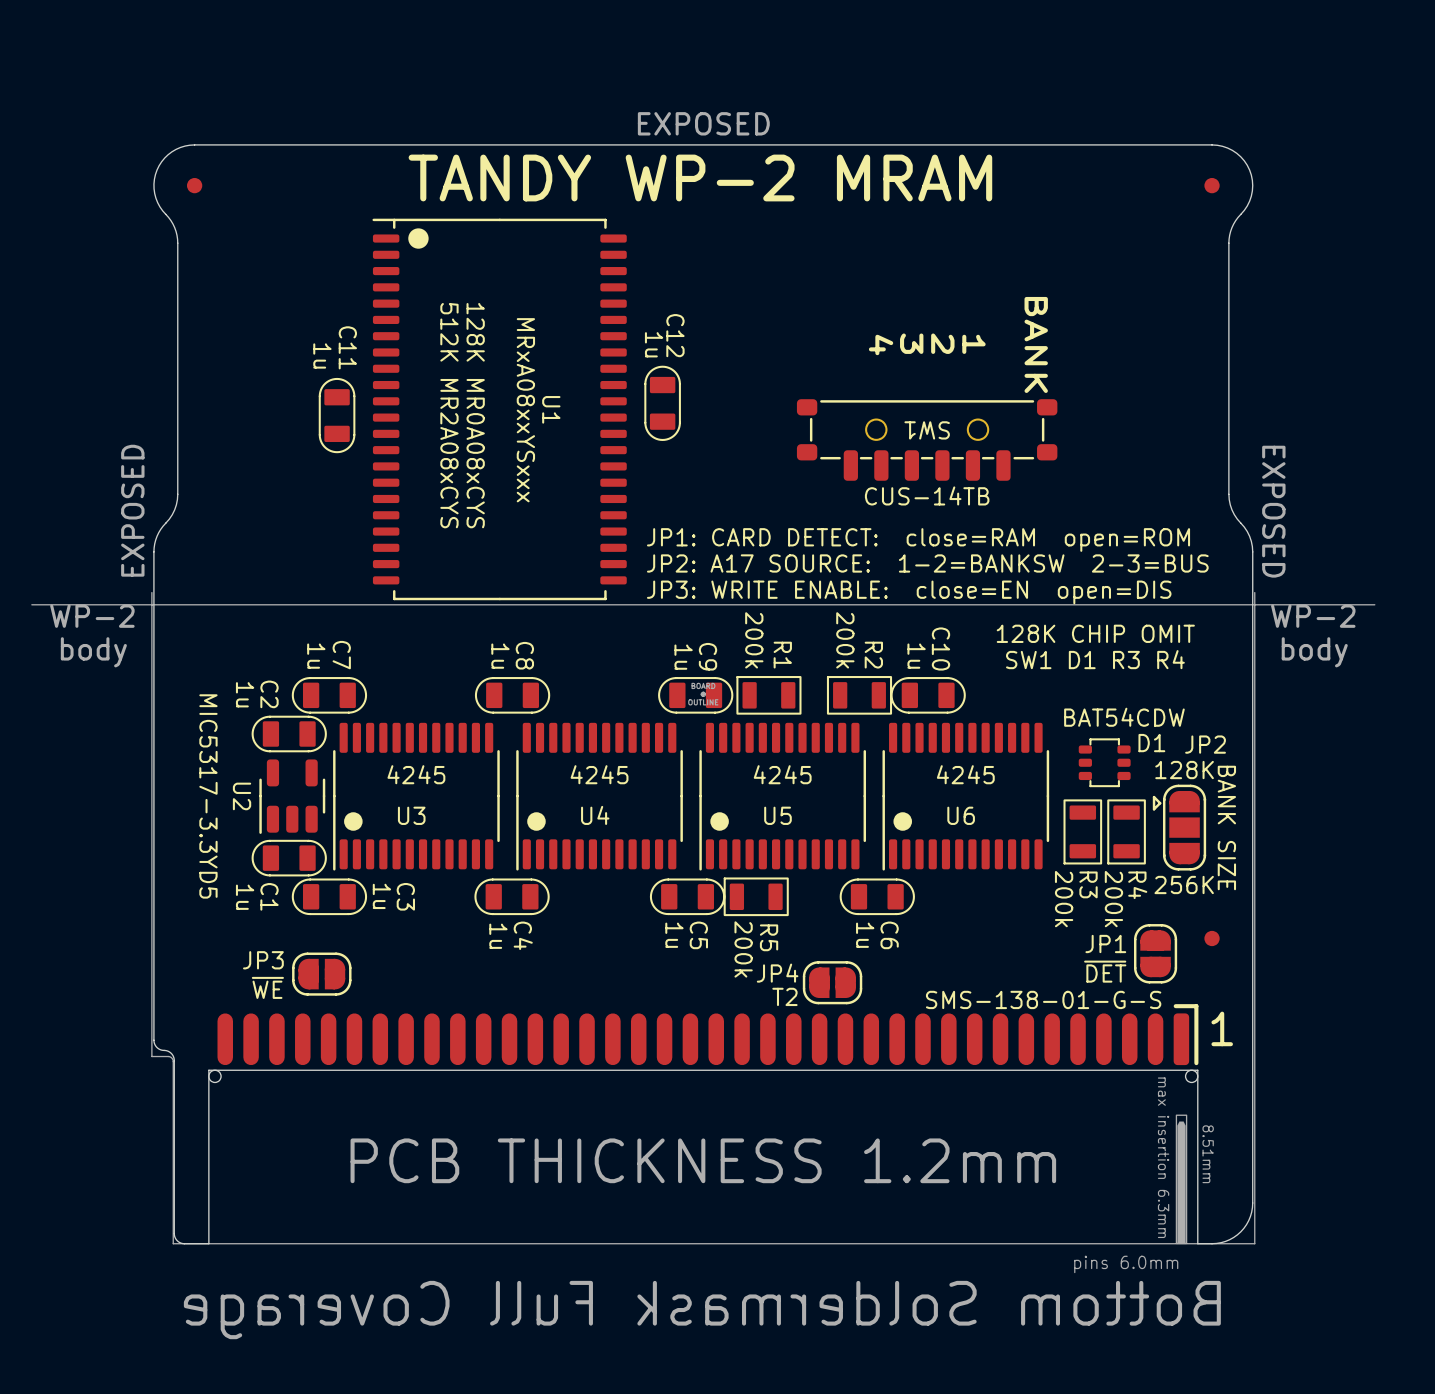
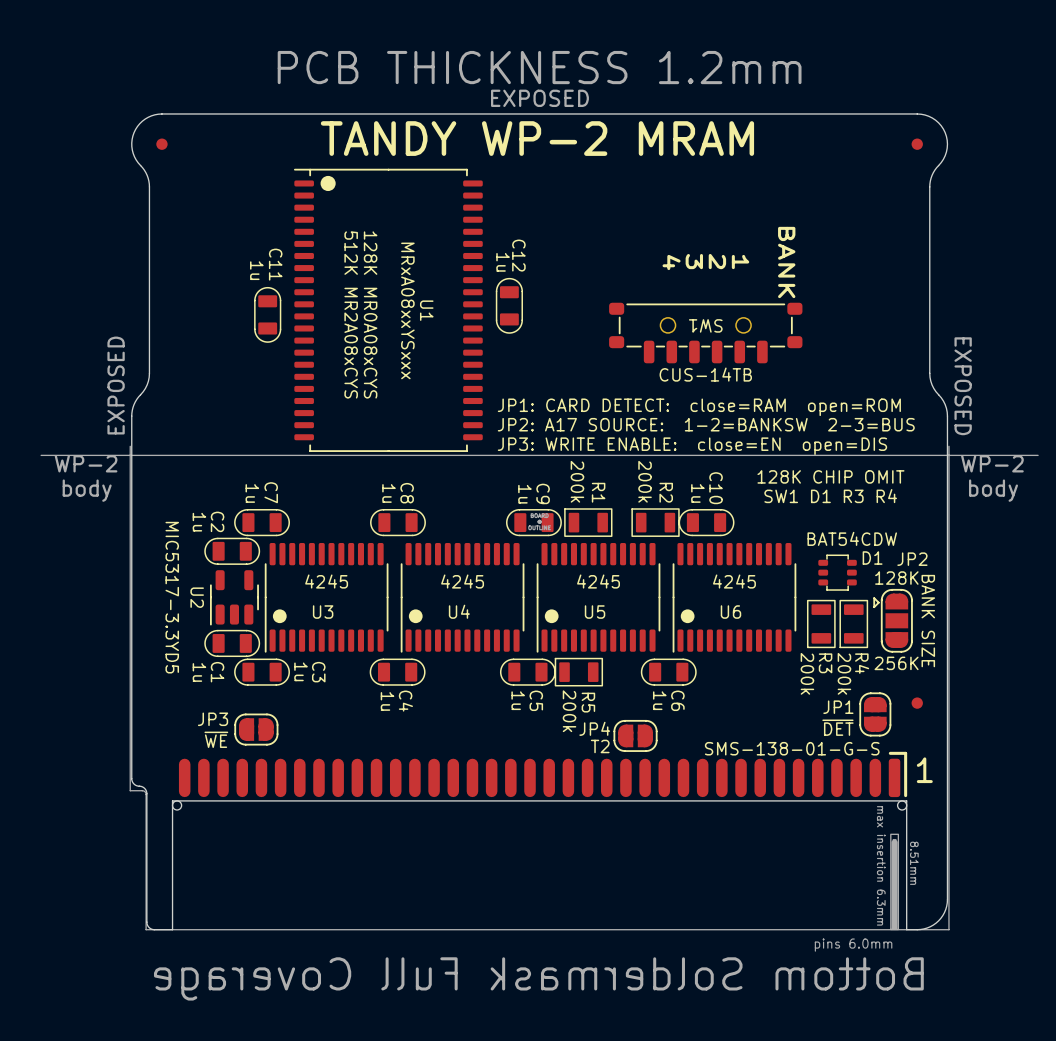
text: none -> PCB THICKNESS 1.2mm (539, 67)
text: PCB THICKNESS 1.2mm (703, 1160) -> none

